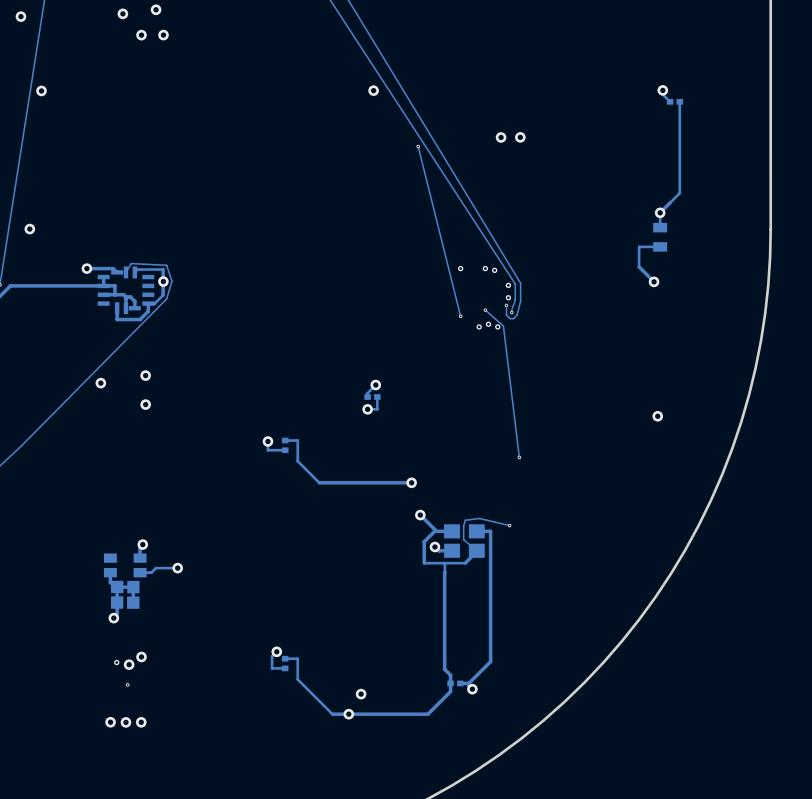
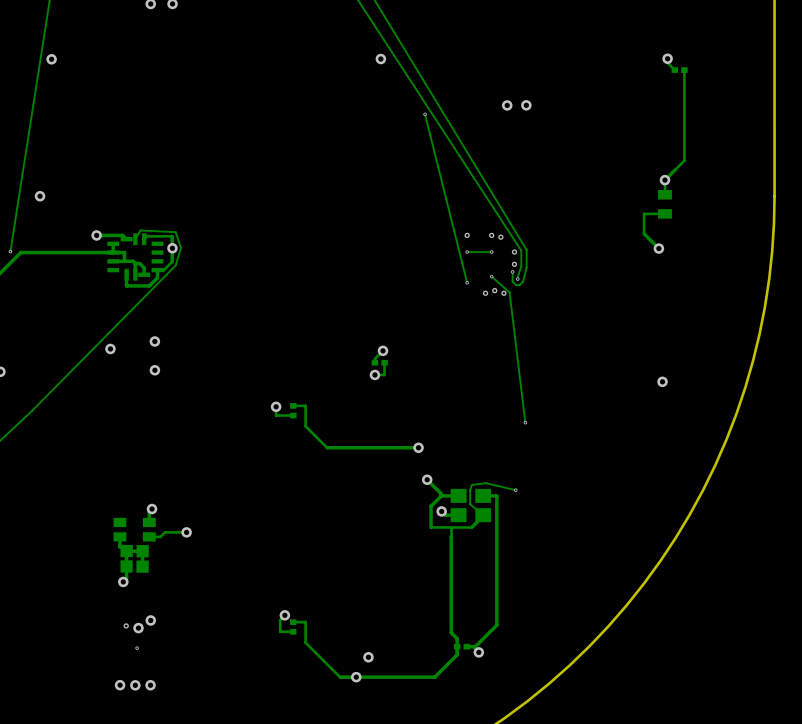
via: none -> (467, 252)
track: none -> (491, 252) (467, 252)
via: none -> (491, 252)

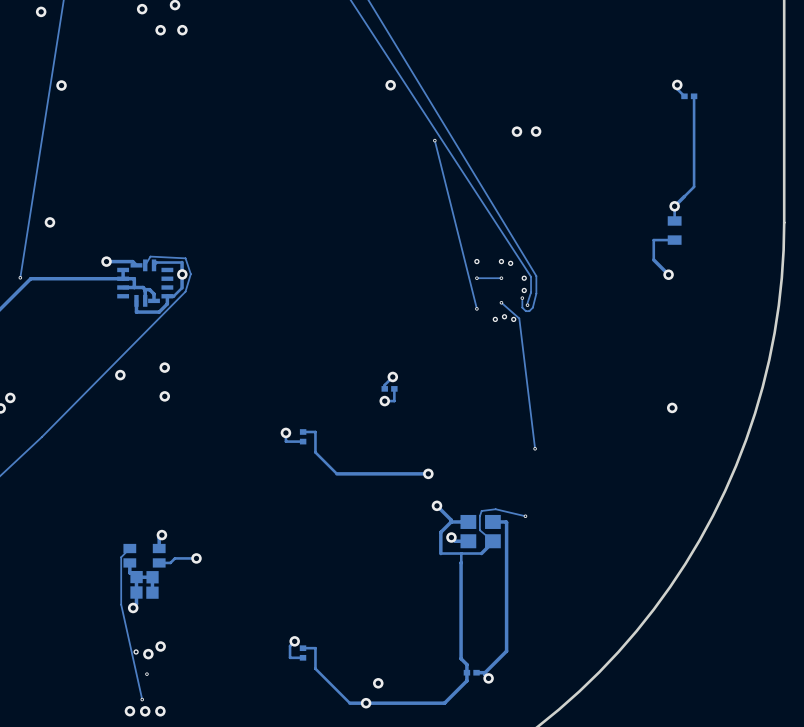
track: none -> (129, 548) (121, 557) (121, 604) (142, 699)
via: none -> (142, 699)

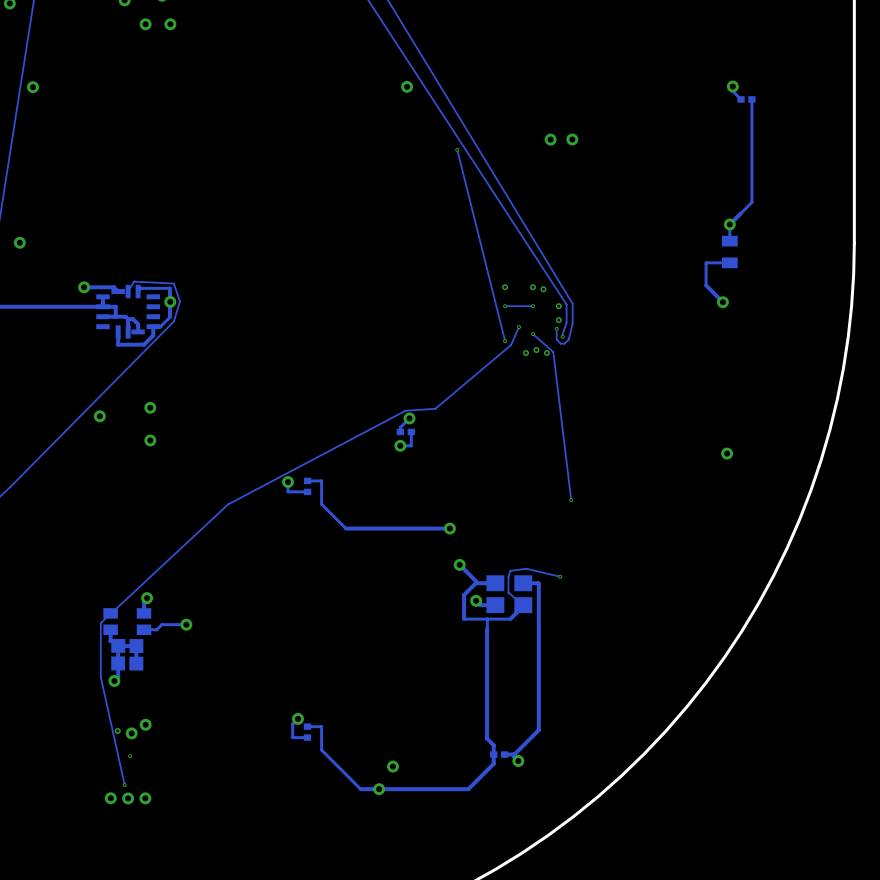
track: none -> (519, 327) (511, 345) (435, 408) (405, 410) (228, 504) (110, 614)
via: none -> (519, 327)

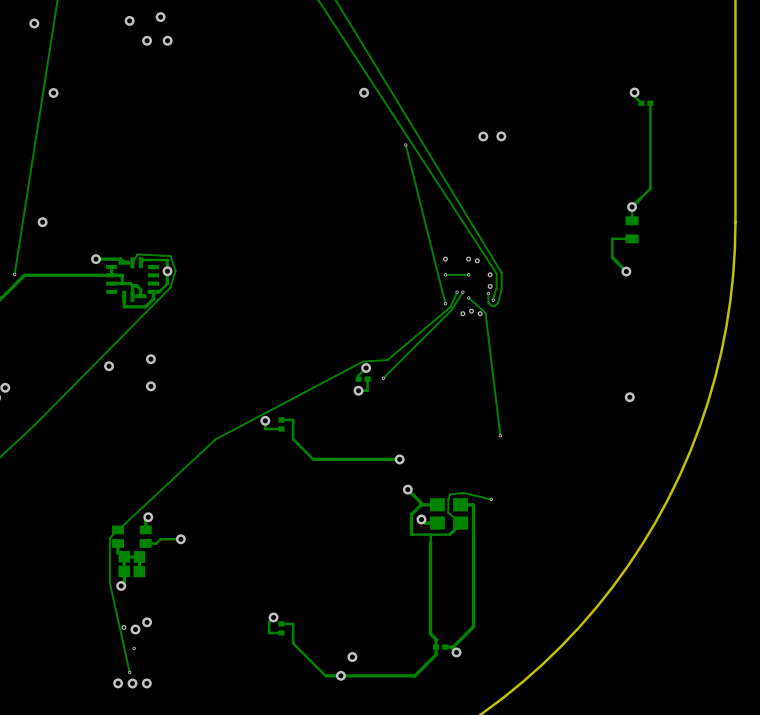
track: none -> (462, 292) (451, 310) (383, 378)
via: none -> (462, 292)
via: none -> (383, 378)

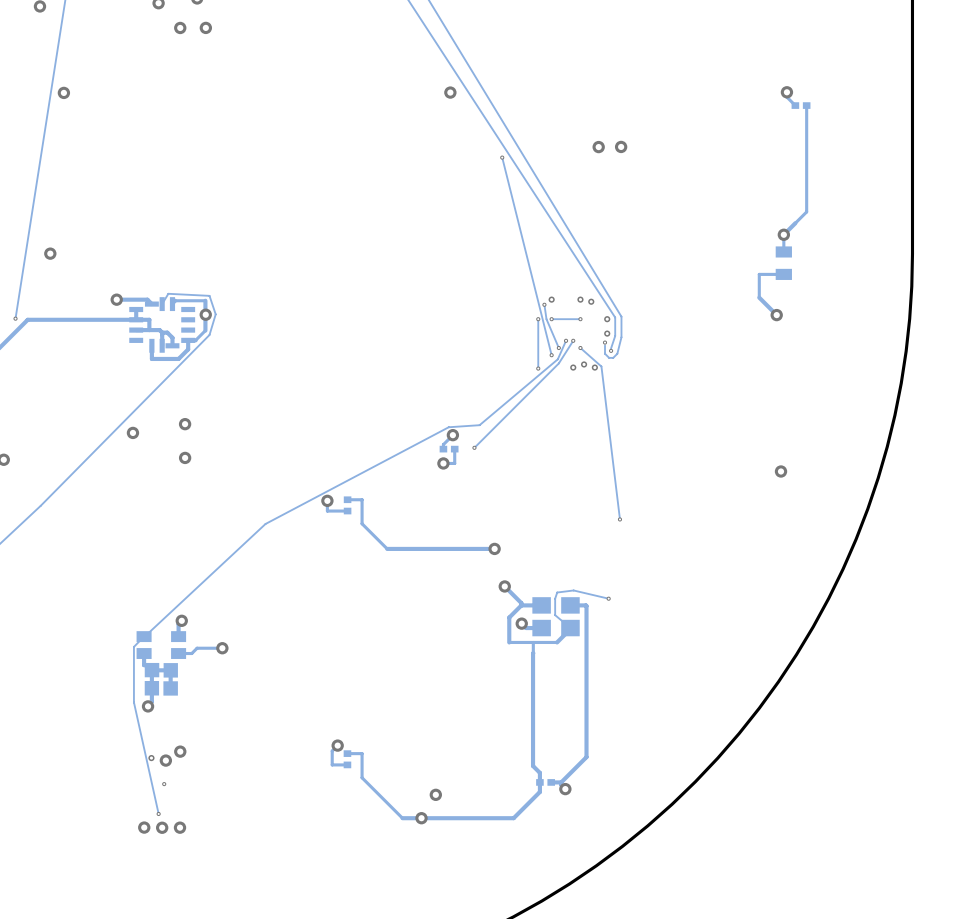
track: none -> (544, 304) (546, 319) (558, 348)
via: none -> (544, 304)
track: none -> (538, 319) (538, 368)
via: none -> (538, 319)
via: none -> (558, 348)
via: none -> (538, 368)

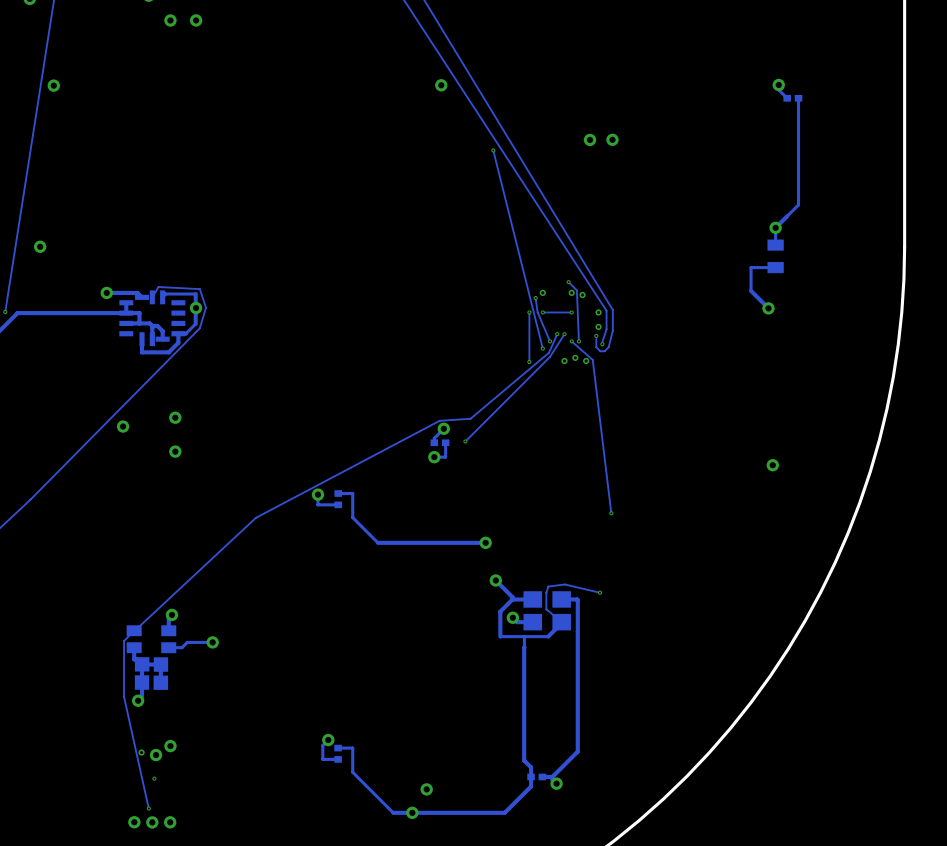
track: none -> (568, 282) (576, 290) (578, 341)
via: none -> (568, 282)
via: none -> (578, 341)

